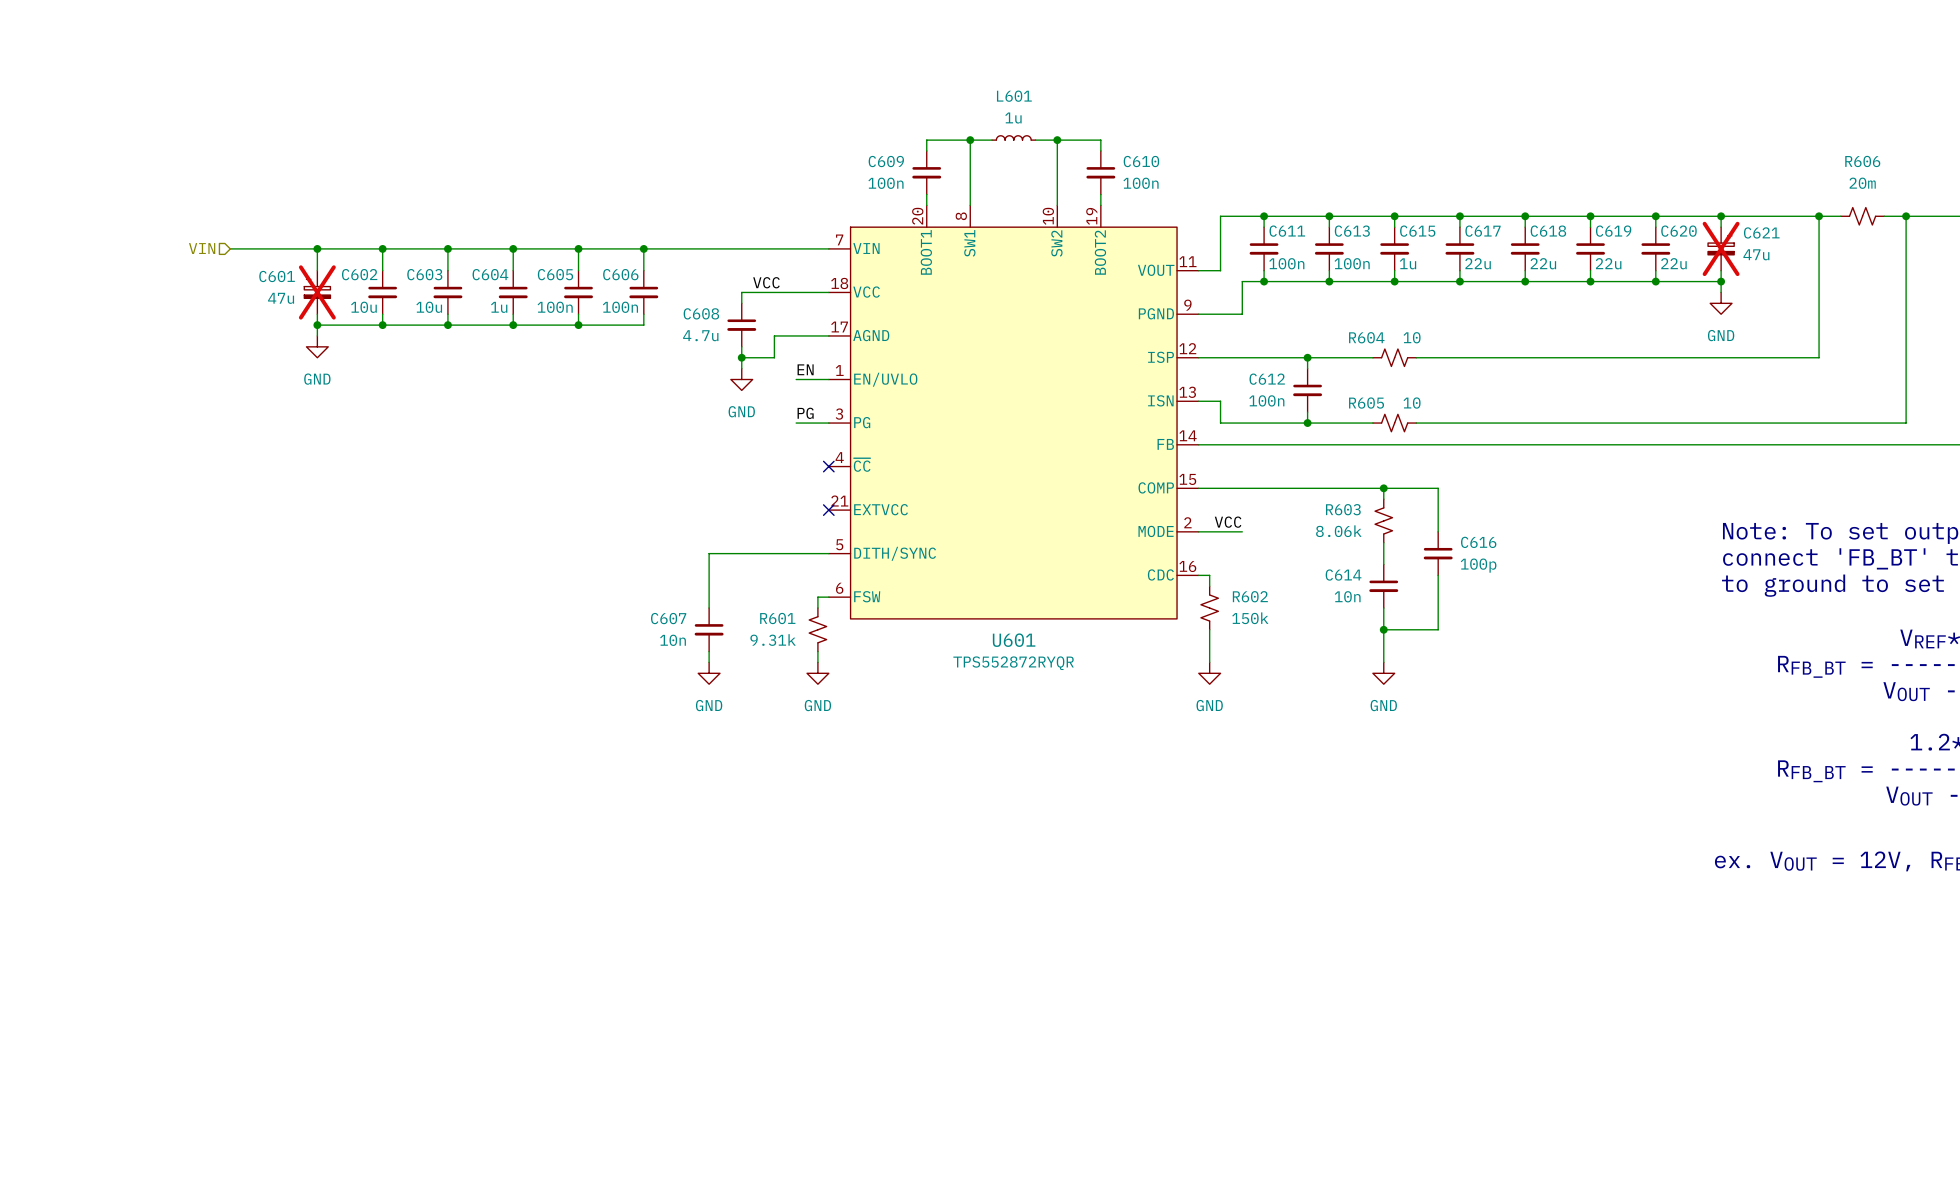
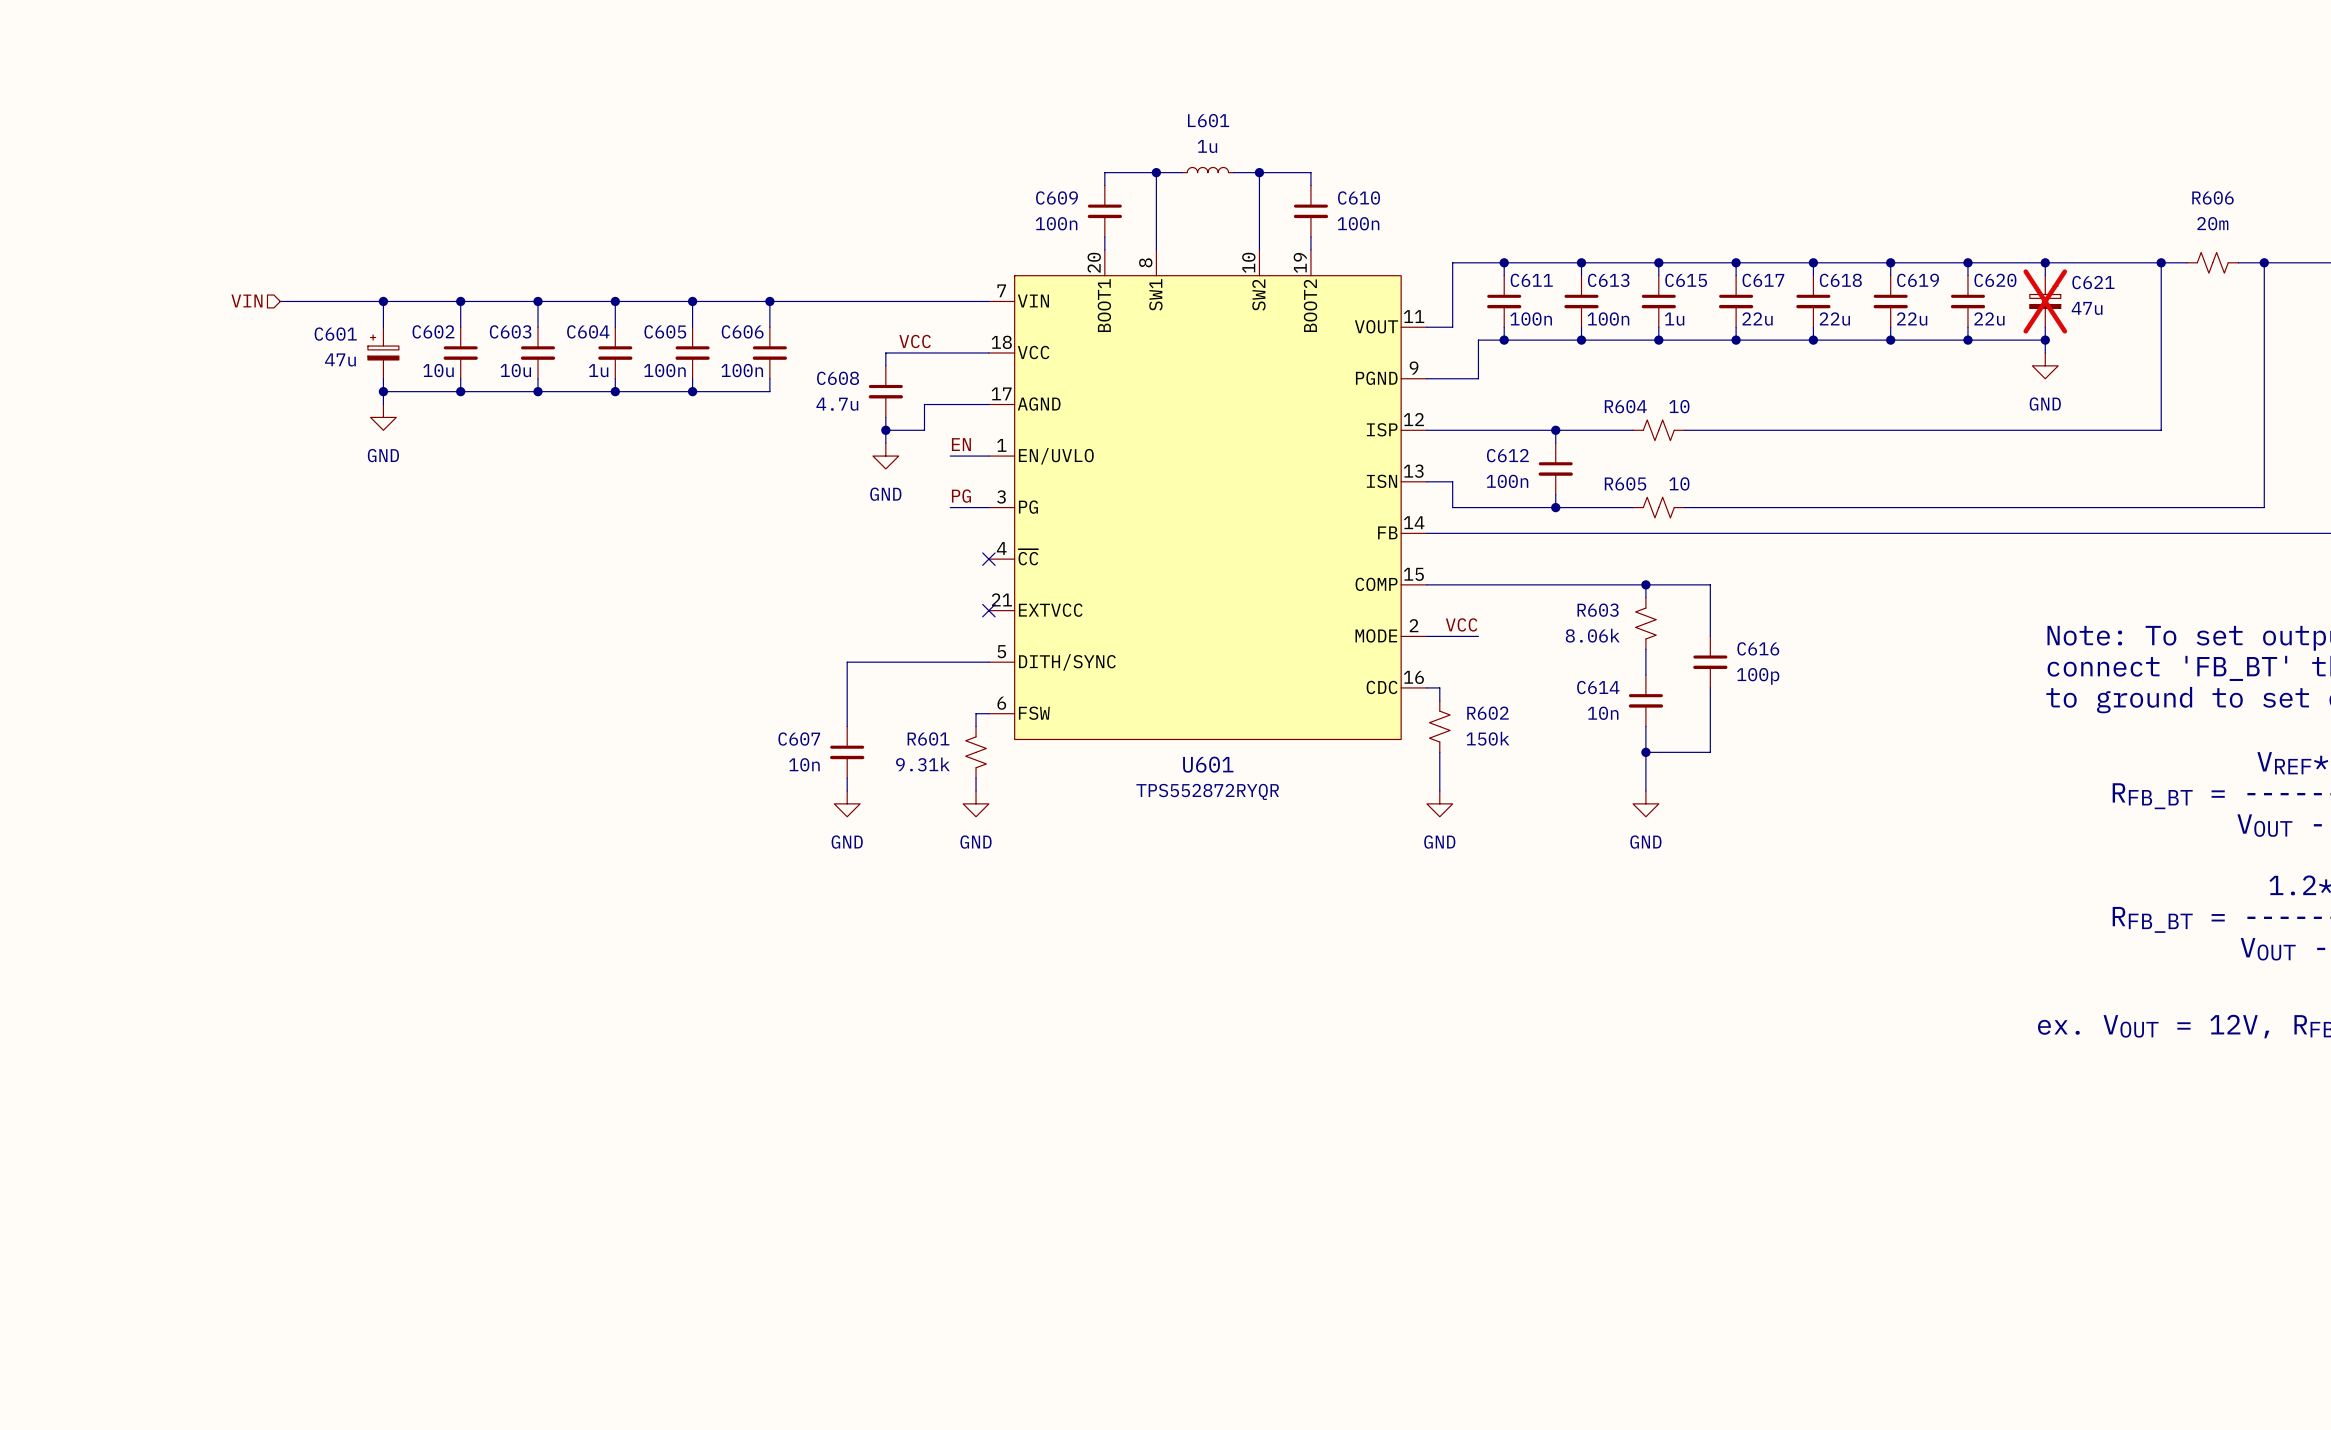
C601 do-not-place cross: (317, 292) -> none

